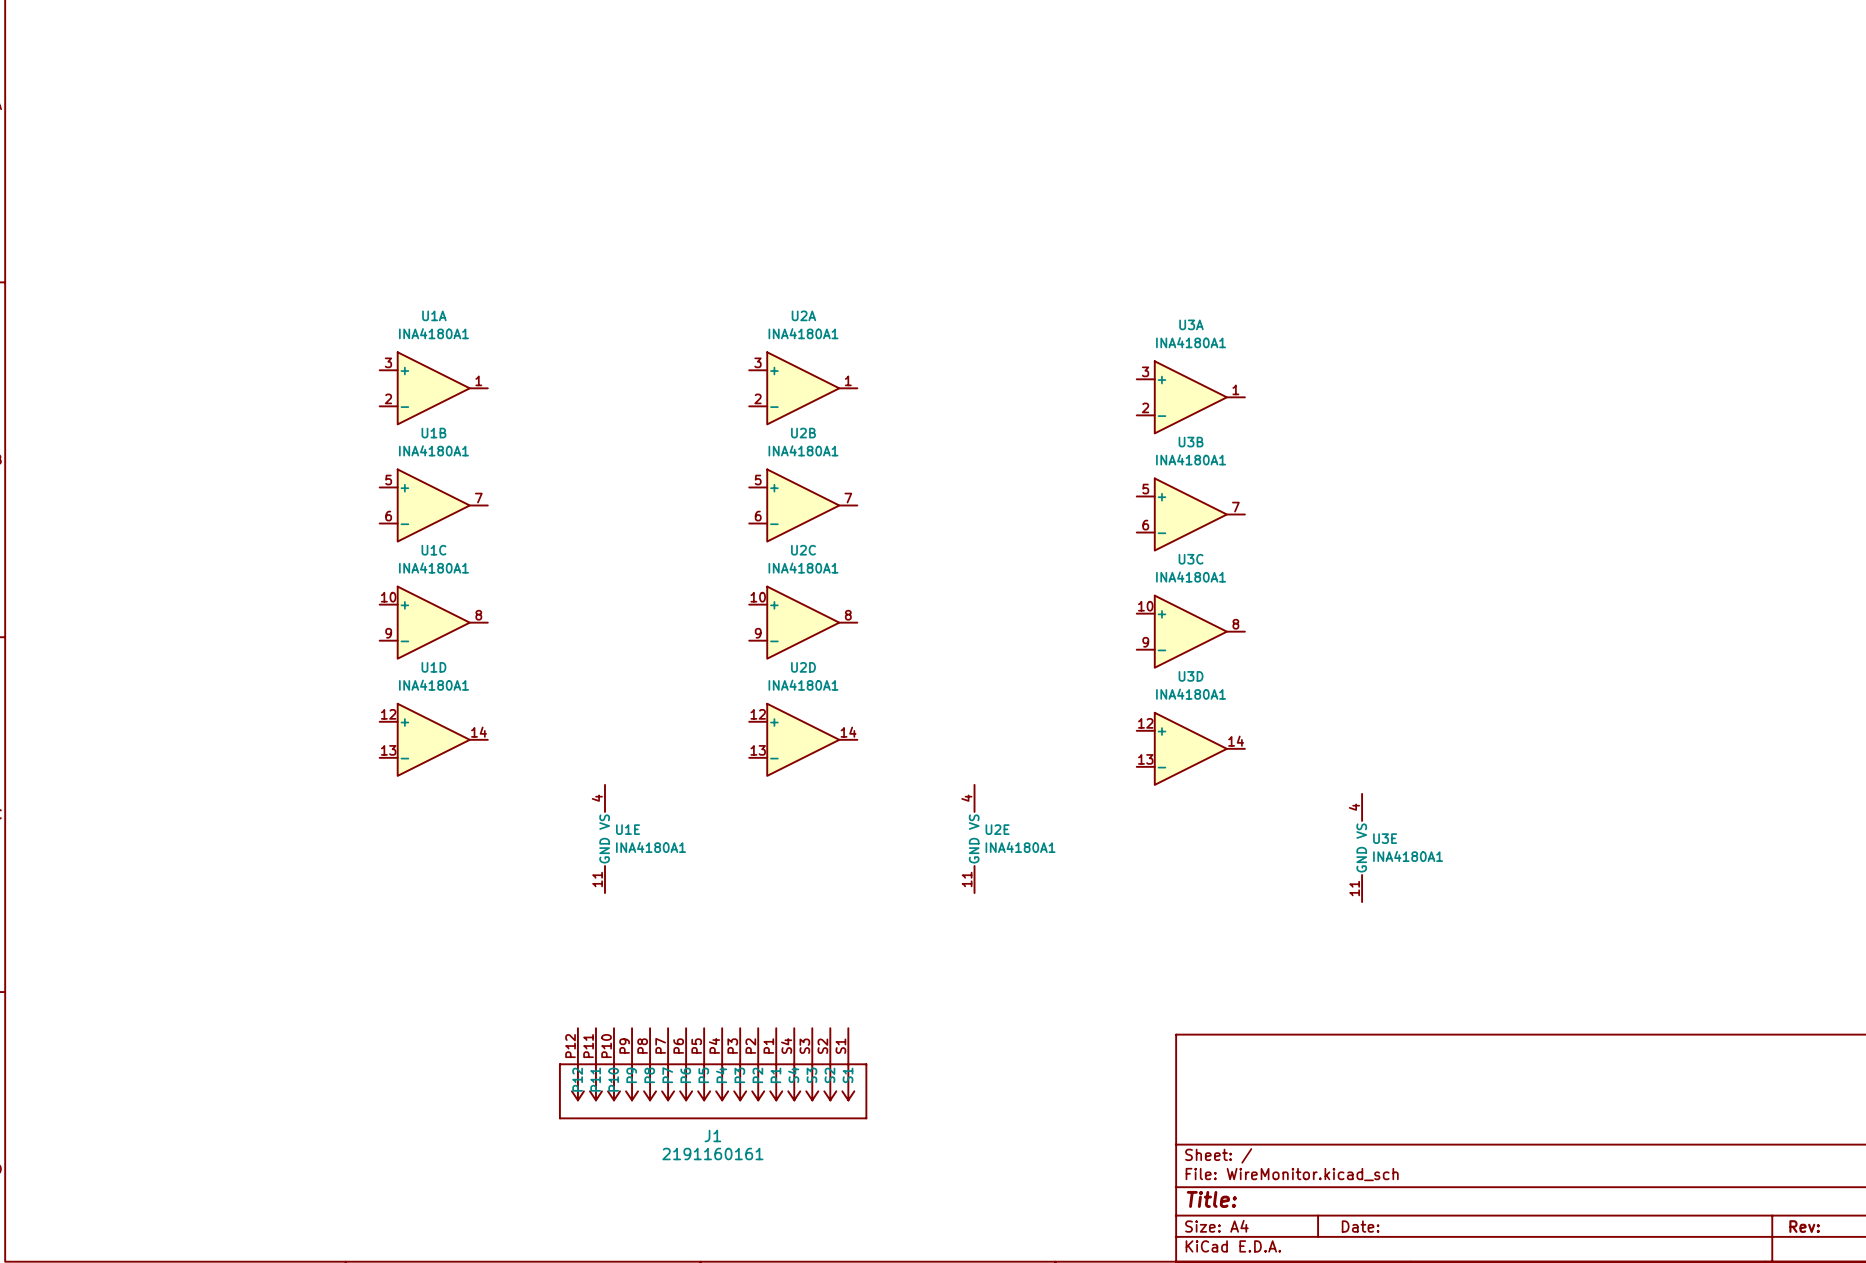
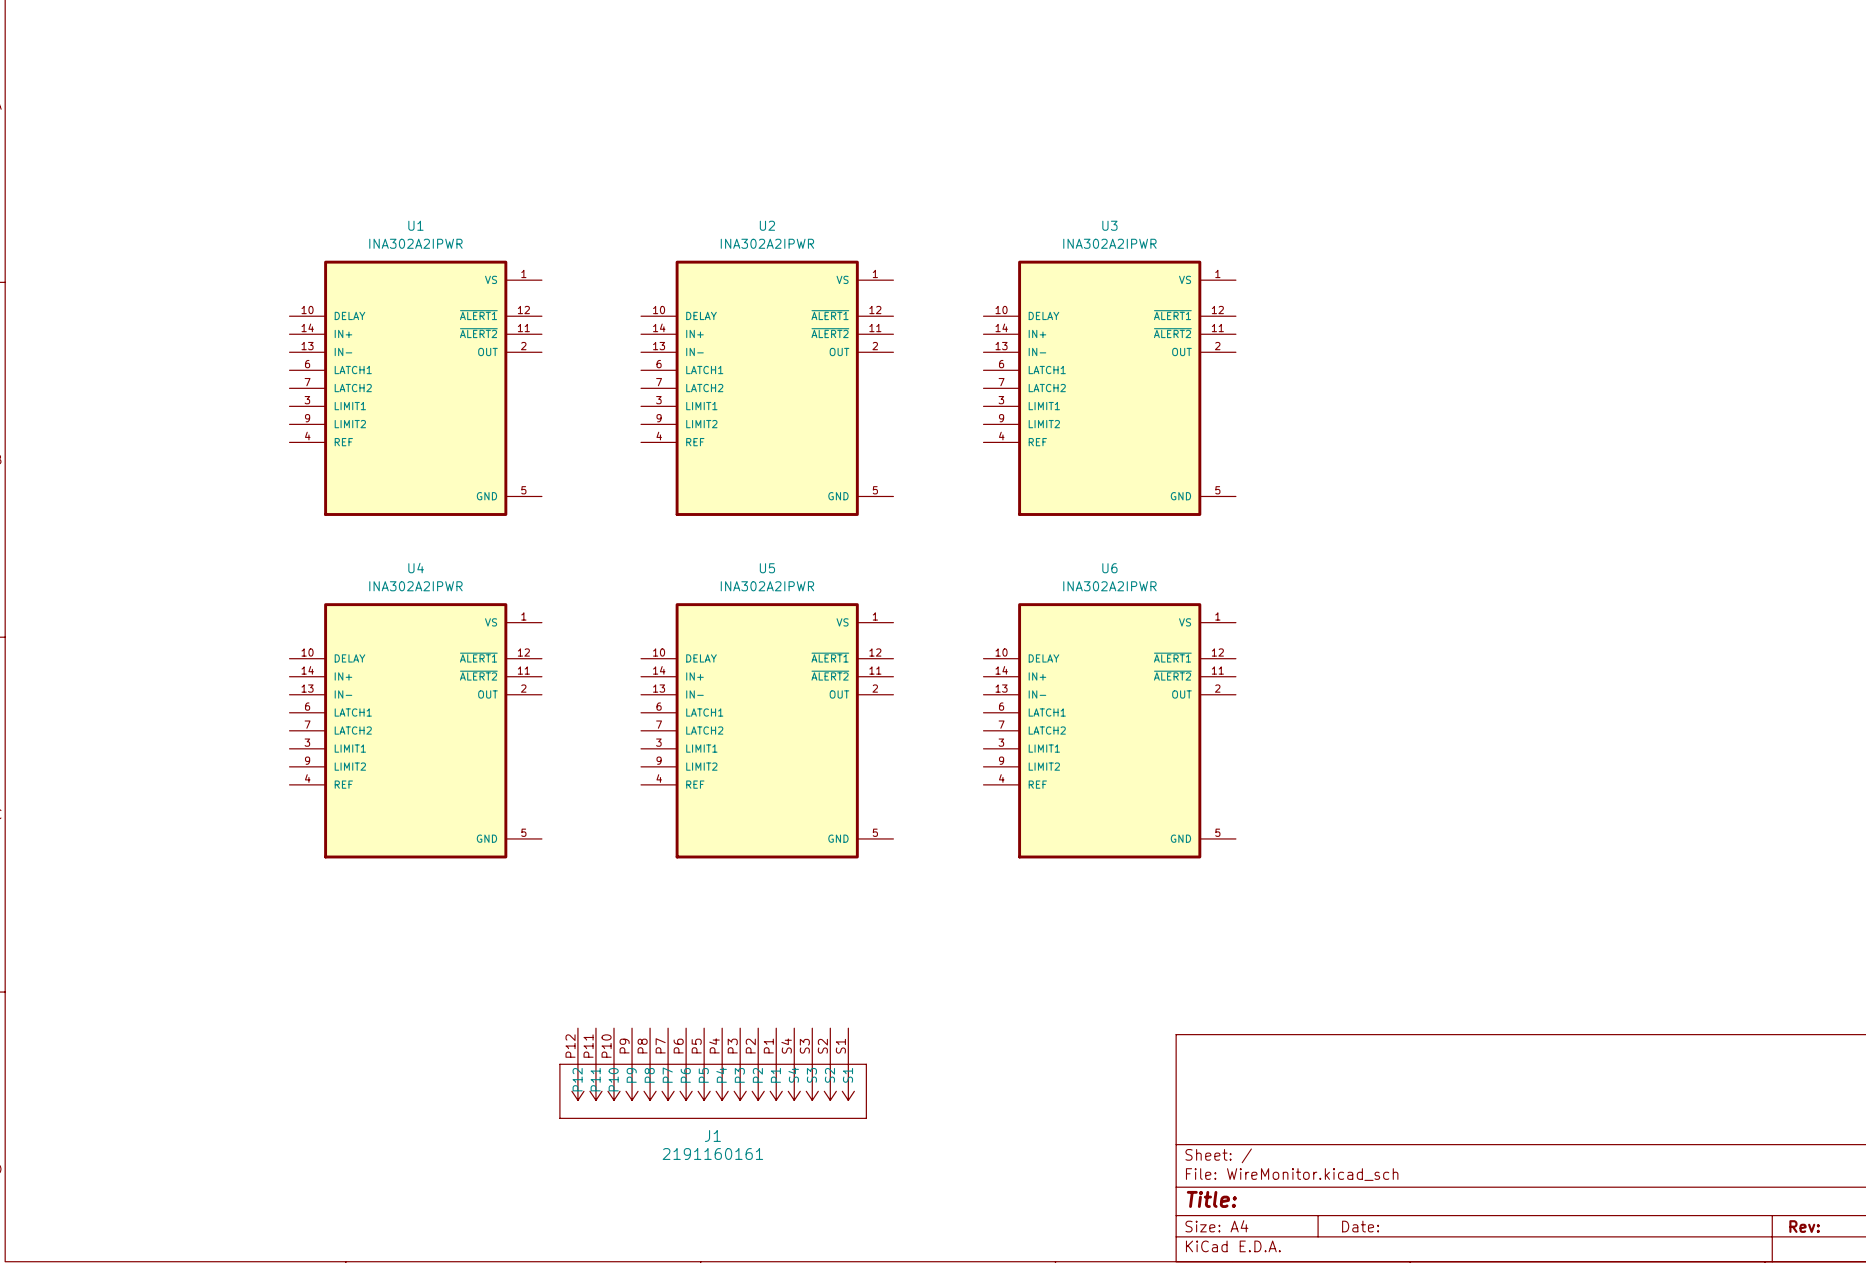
U1: none -> INA302A2IPWR (415, 388)
U1A: INA4180A1 (433, 388) -> none
U2: none -> INA302A2IPWR (767, 388)
U2A: INA4180A1 (803, 388) -> none
U3: none -> INA302A2IPWR (1109, 388)
U3A: INA4180A1 (1190, 397) -> none
U1B: INA4180A1 (433, 505) -> none
U2B: INA4180A1 (803, 505) -> none
U3B: INA4180A1 (1190, 514) -> none
U1C: INA4180A1 (433, 622) -> none
U2C: INA4180A1 (803, 622) -> none
U3C: INA4180A1 (1190, 631) -> none
U4: none -> INA302A2IPWR (415, 730)
U5: none -> INA302A2IPWR (767, 730)
U6: none -> INA302A2IPWR (1109, 730)
U1D: INA4180A1 (433, 739) -> none
U2D: INA4180A1 (803, 739) -> none
U3D: INA4180A1 (1190, 748) -> none
U1E: INA4180A1 (604, 838) -> none
U2E: INA4180A1 (974, 838) -> none
U3E: INA4180A1 (1362, 847) -> none

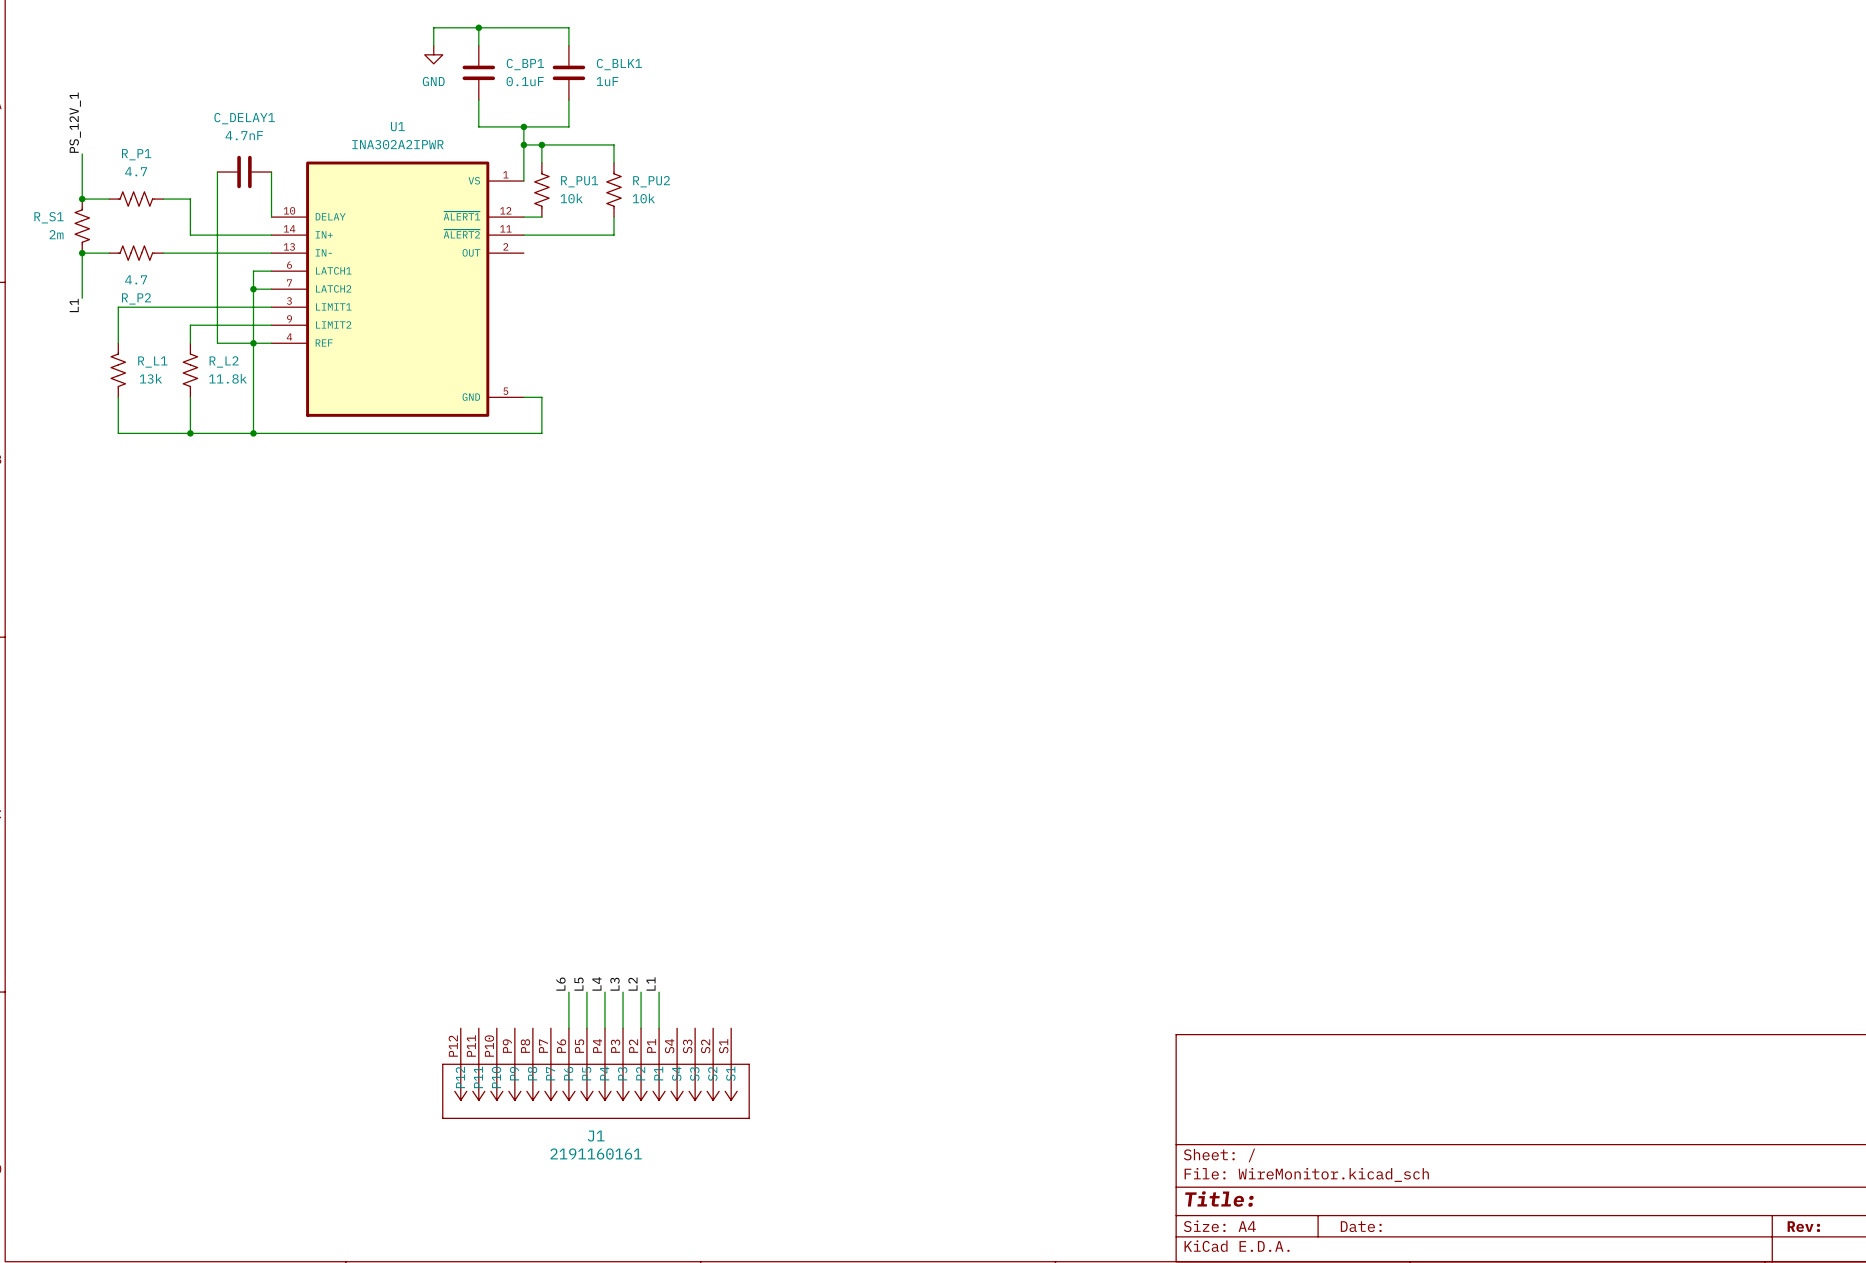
wire: none -> (478, 27) (478, 45)
junction: none -> (478, 27)
wire: none -> (433, 45) (433, 27) (568, 27) (568, 45)
power symbol: none -> GND (433, 54)
C_BP1: none -> 0.1uF (478, 72)
C_BLK1: none -> 1uF (568, 72)
wire: none -> (478, 99) (478, 126) (568, 126) (568, 99)
label: none -> PS_12V_1 (75, 122)
wire: none -> (523, 126) (523, 181)
junction: none -> (523, 126)
wire: none -> (523, 144) (614, 144) (614, 163)
junction: none -> (523, 144)
wire: none -> (541, 144) (541, 163)
junction: none -> (541, 144)
wire: none -> (82, 153) (82, 199) (109, 199)
wire: none -> (217, 172) (217, 343) (271, 343)
C_DELAY1: none -> 4.7nF (244, 172)
wire: none -> (271, 172) (271, 217)
R_PU1: none -> 10k (541, 190)
R_PU2: none -> 10k (614, 190)
junction: none -> (82, 199)
R_P1: none -> 4.7 (136, 199)
wire: none -> (163, 199) (190, 199) (190, 235) (271, 235)
wire: none -> (523, 217) (541, 217)
wire: none -> (614, 217) (614, 235) (523, 235)
R_S1: none -> 2m (82, 226)
junction: none -> (82, 253)
wire: none -> (109, 253) (82, 253) (82, 298)
R_P2: none -> 4.7 (136, 253)
wire: none -> (163, 253) (271, 253)
wire: none -> (271, 271) (253, 271) (253, 433)
wire: none -> (253, 289) (271, 289)
junction: none -> (253, 289)
label: none -> L1 (74, 305)
wire: none -> (271, 307) (118, 307) (118, 343)
wire: none -> (271, 325) (190, 325) (190, 343)
junction: none -> (253, 343)
R_L1: none -> 13k (118, 370)
R_L2: none -> 11.8k (190, 370)
U1 position: (415, 388) -> (397, 289)
U2: INA302A2IPWR (767, 388) -> none
U3: INA302A2IPWR (1109, 388) -> none
wire: none -> (118, 397) (118, 433) (541, 433) (541, 397) (523, 397)
wire: none -> (190, 397) (190, 433)
junction: none -> (190, 433)
junction: none -> (253, 433)
U4: INA302A2IPWR (415, 730) -> none
U5: INA302A2IPWR (767, 730) -> none
U6: INA302A2IPWR (1109, 730) -> none
label: none -> L6 (560, 984)
label: none -> L5 (579, 984)
label: none -> L4 (596, 983)
label: none -> L3 (614, 984)
label: none -> L2 (632, 984)
label: none -> L1 (651, 983)
wire: none -> (568, 992) (568, 1028)
wire: none -> (586, 992) (586, 1028)
wire: none -> (604, 992) (604, 1028)
wire: none -> (623, 992) (623, 1028)
wire: none -> (641, 992) (641, 1028)
wire: none -> (659, 992) (659, 1028)
J1 position: (713, 1073) -> (595, 1073)

